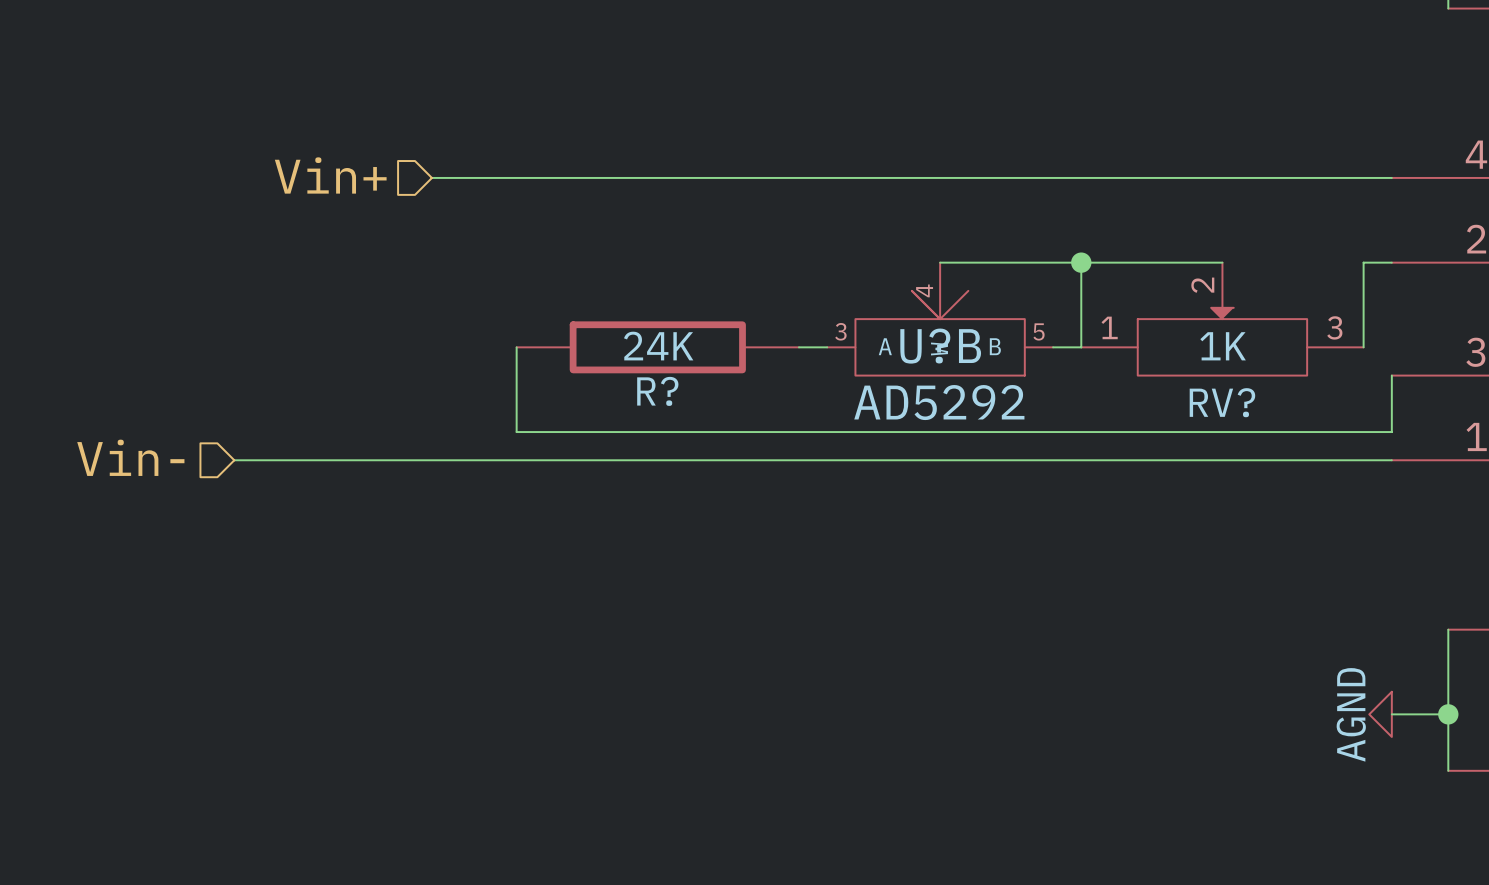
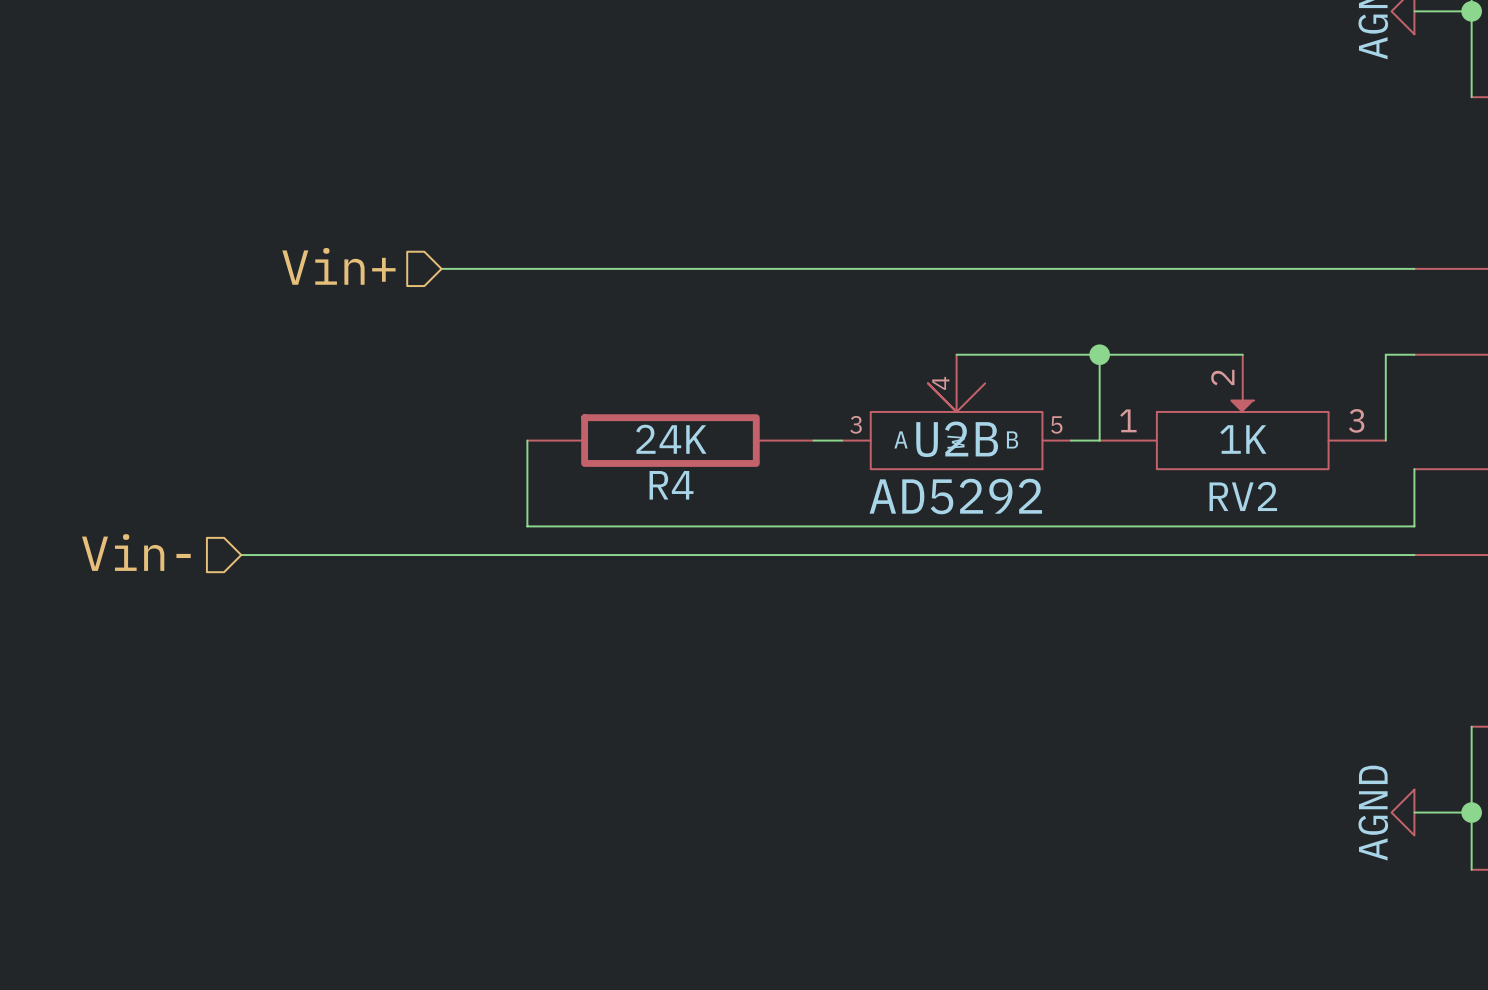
U?B name: U?B (940, 346) -> U2B (957, 439)
R? name: R? (657, 391) -> R4 (671, 485)
RV? name: RV? (1222, 402) -> RV2 (1243, 496)

